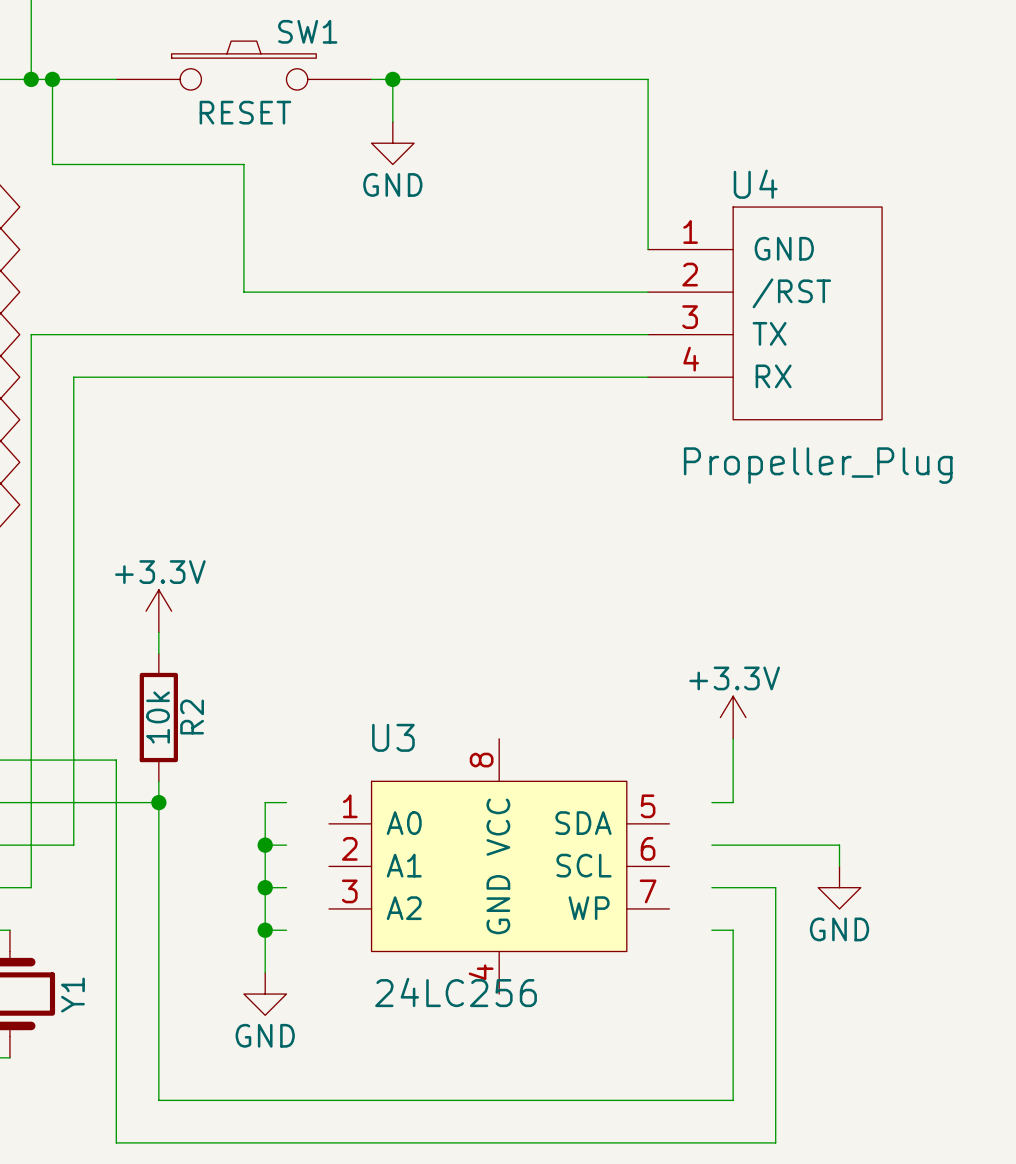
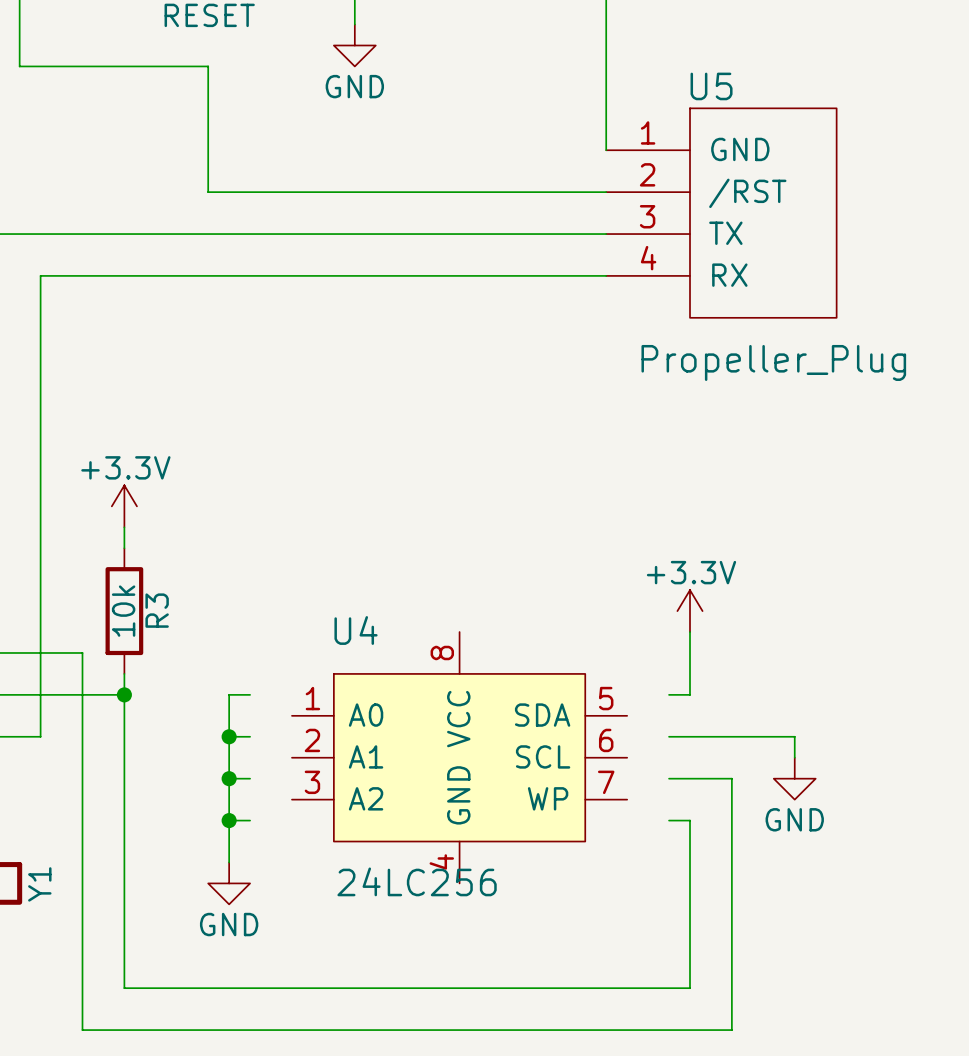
U4 name: U4 (755, 184) -> U5 (711, 86)
R2 name: R2 (192, 717) -> R3 (157, 610)
U3 name: U3 (393, 737) -> U4 (356, 630)

